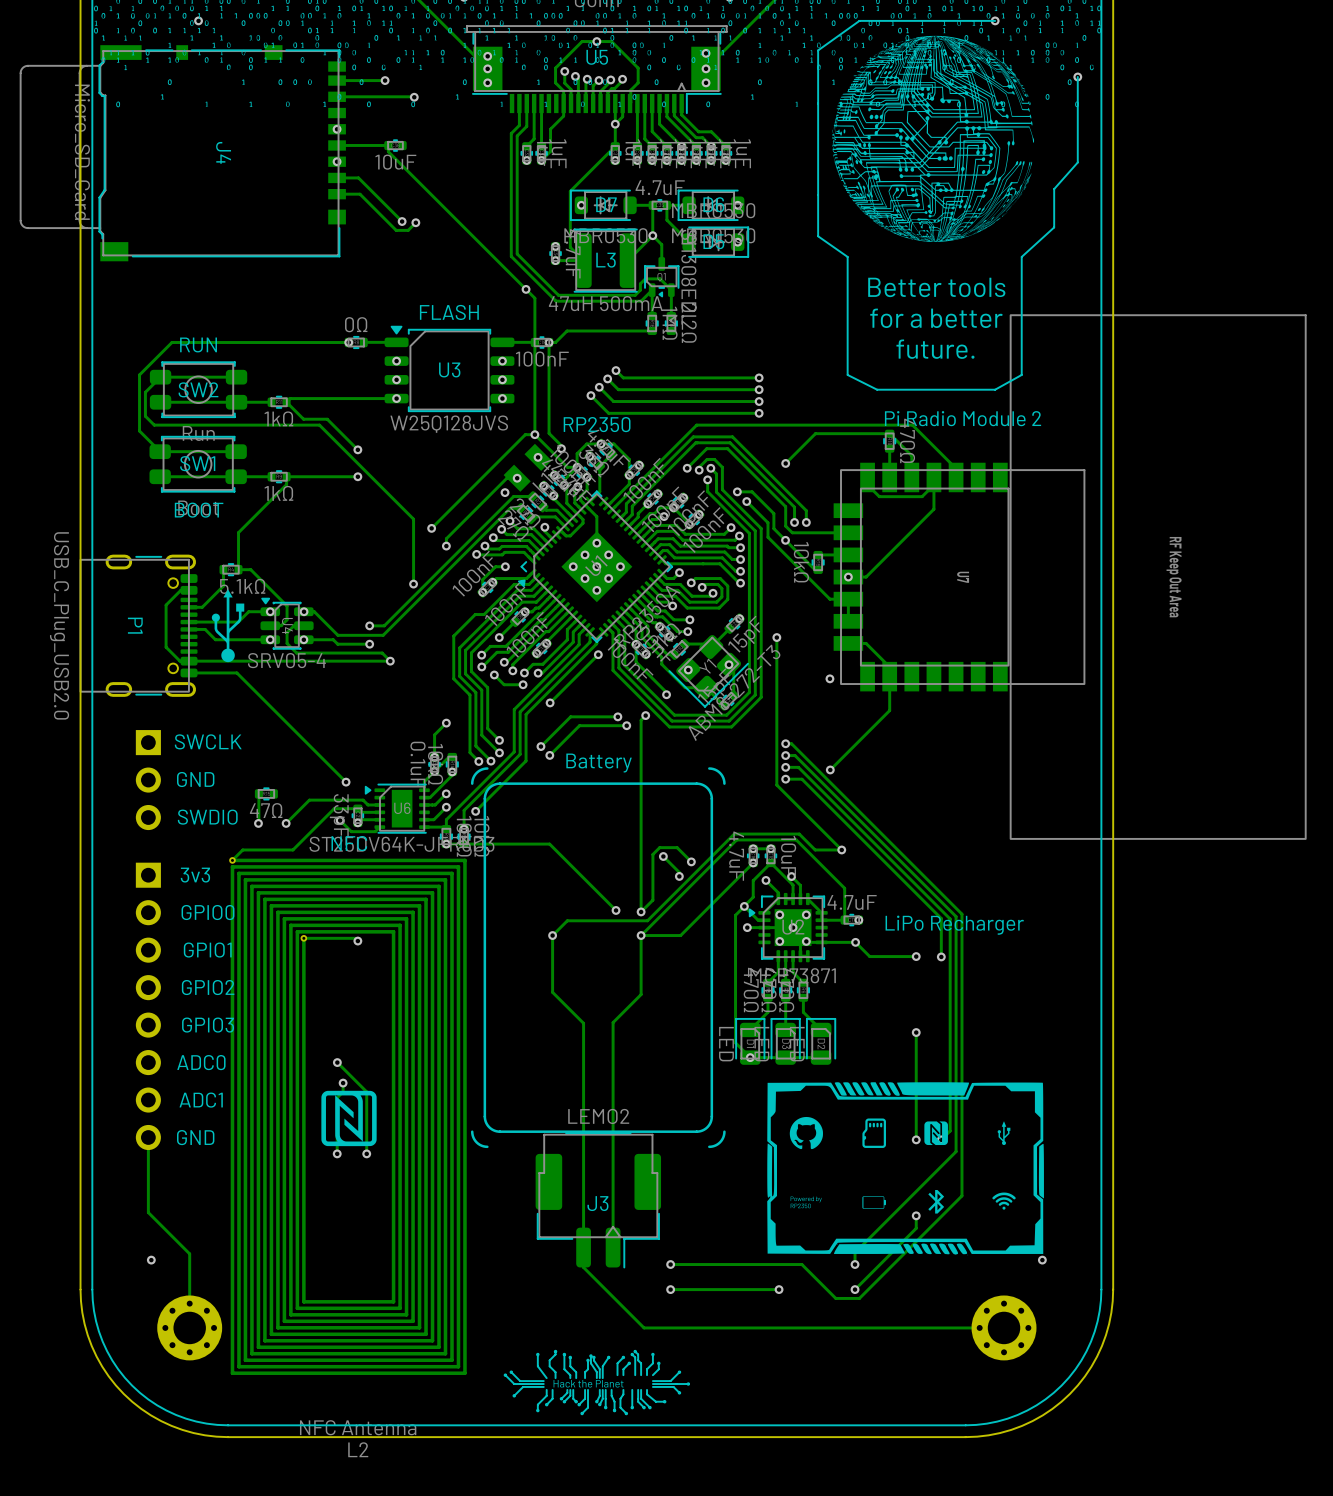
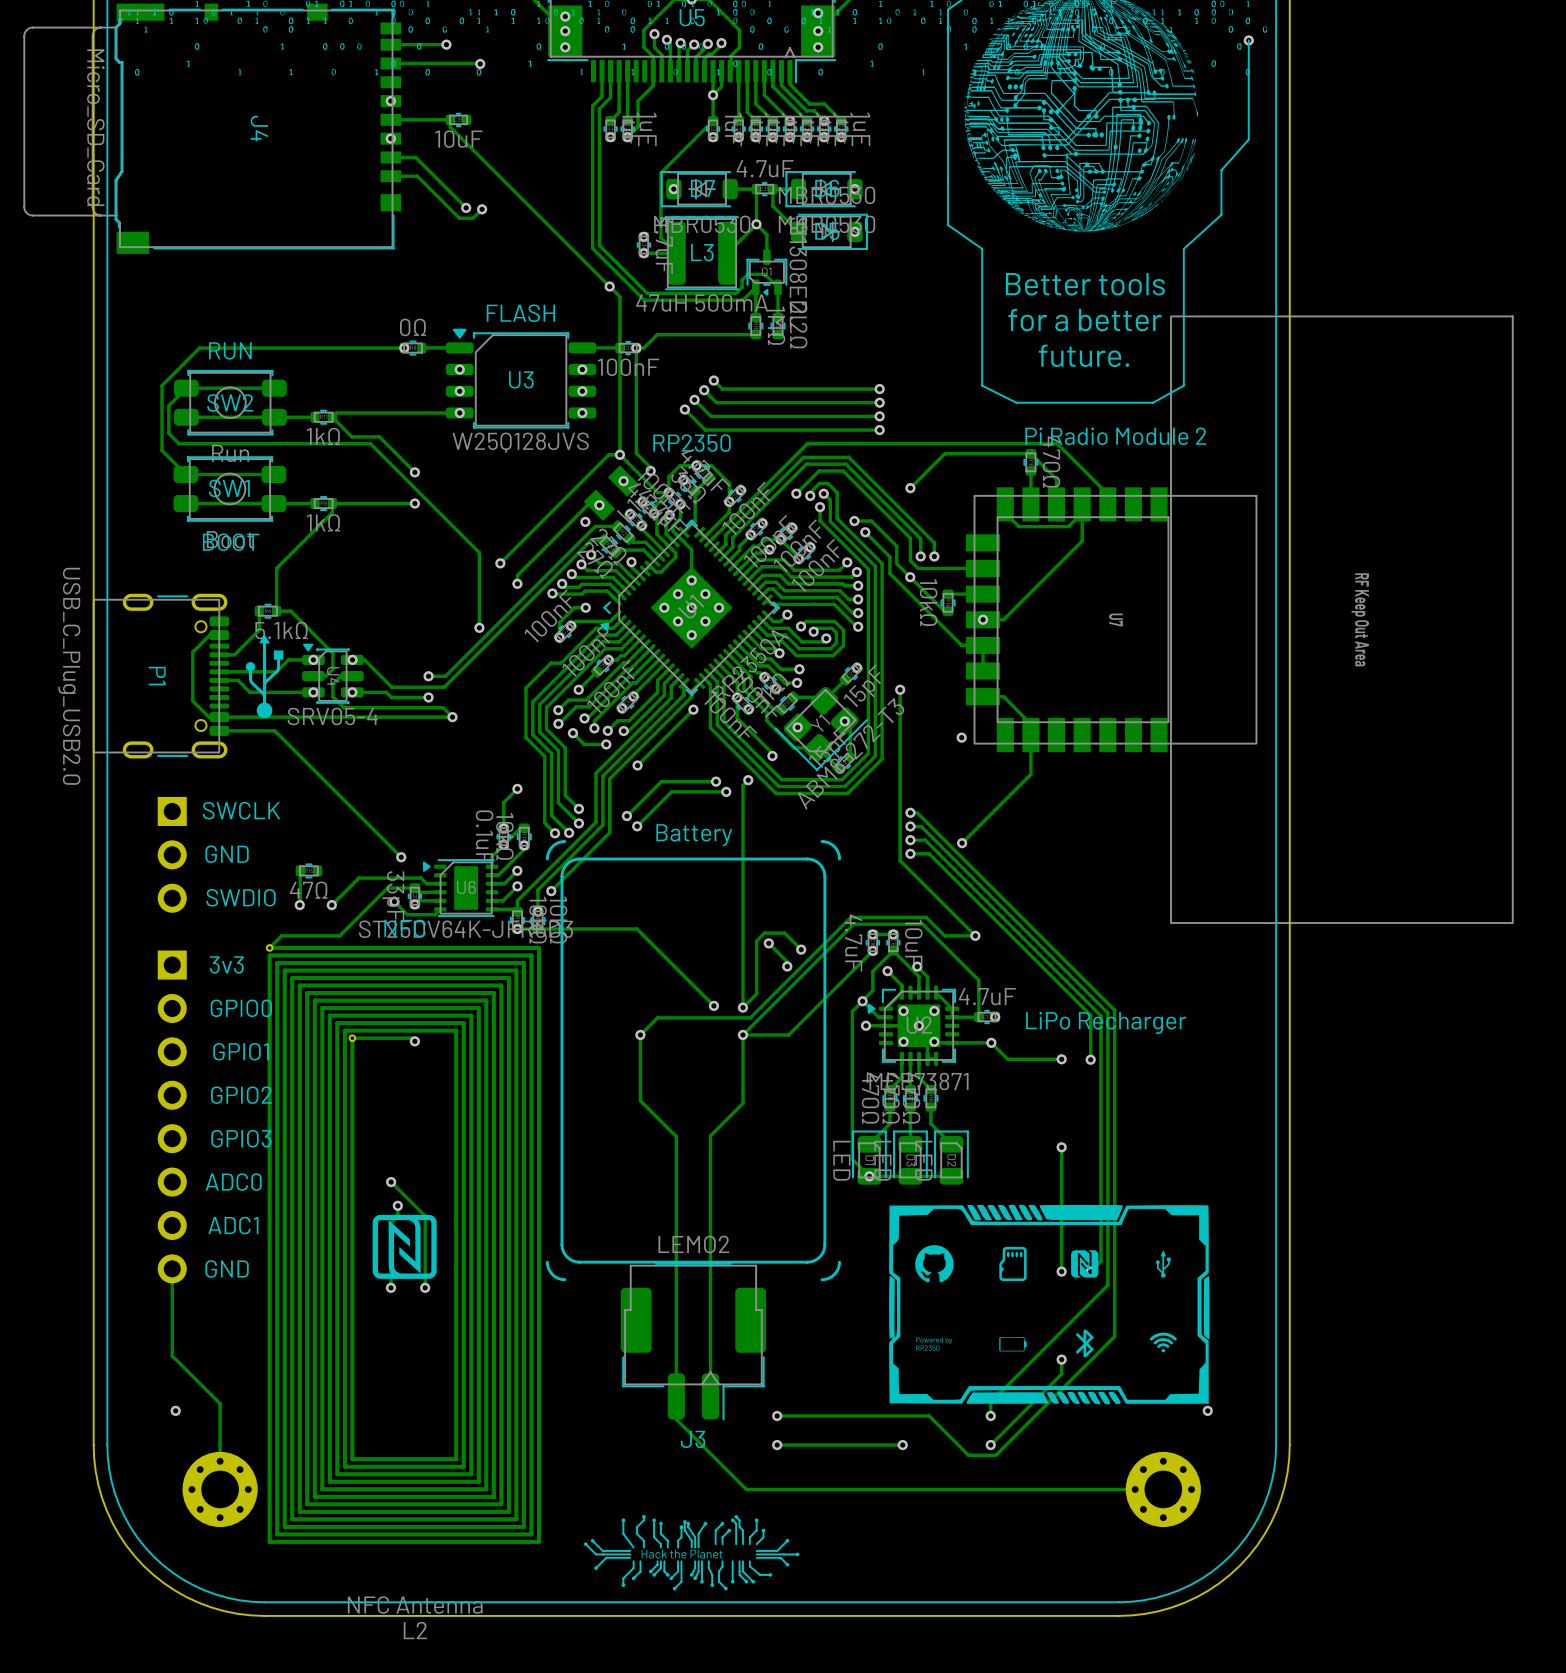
J3 name position: J3 (597, 1203) -> J3 (692, 1439)

